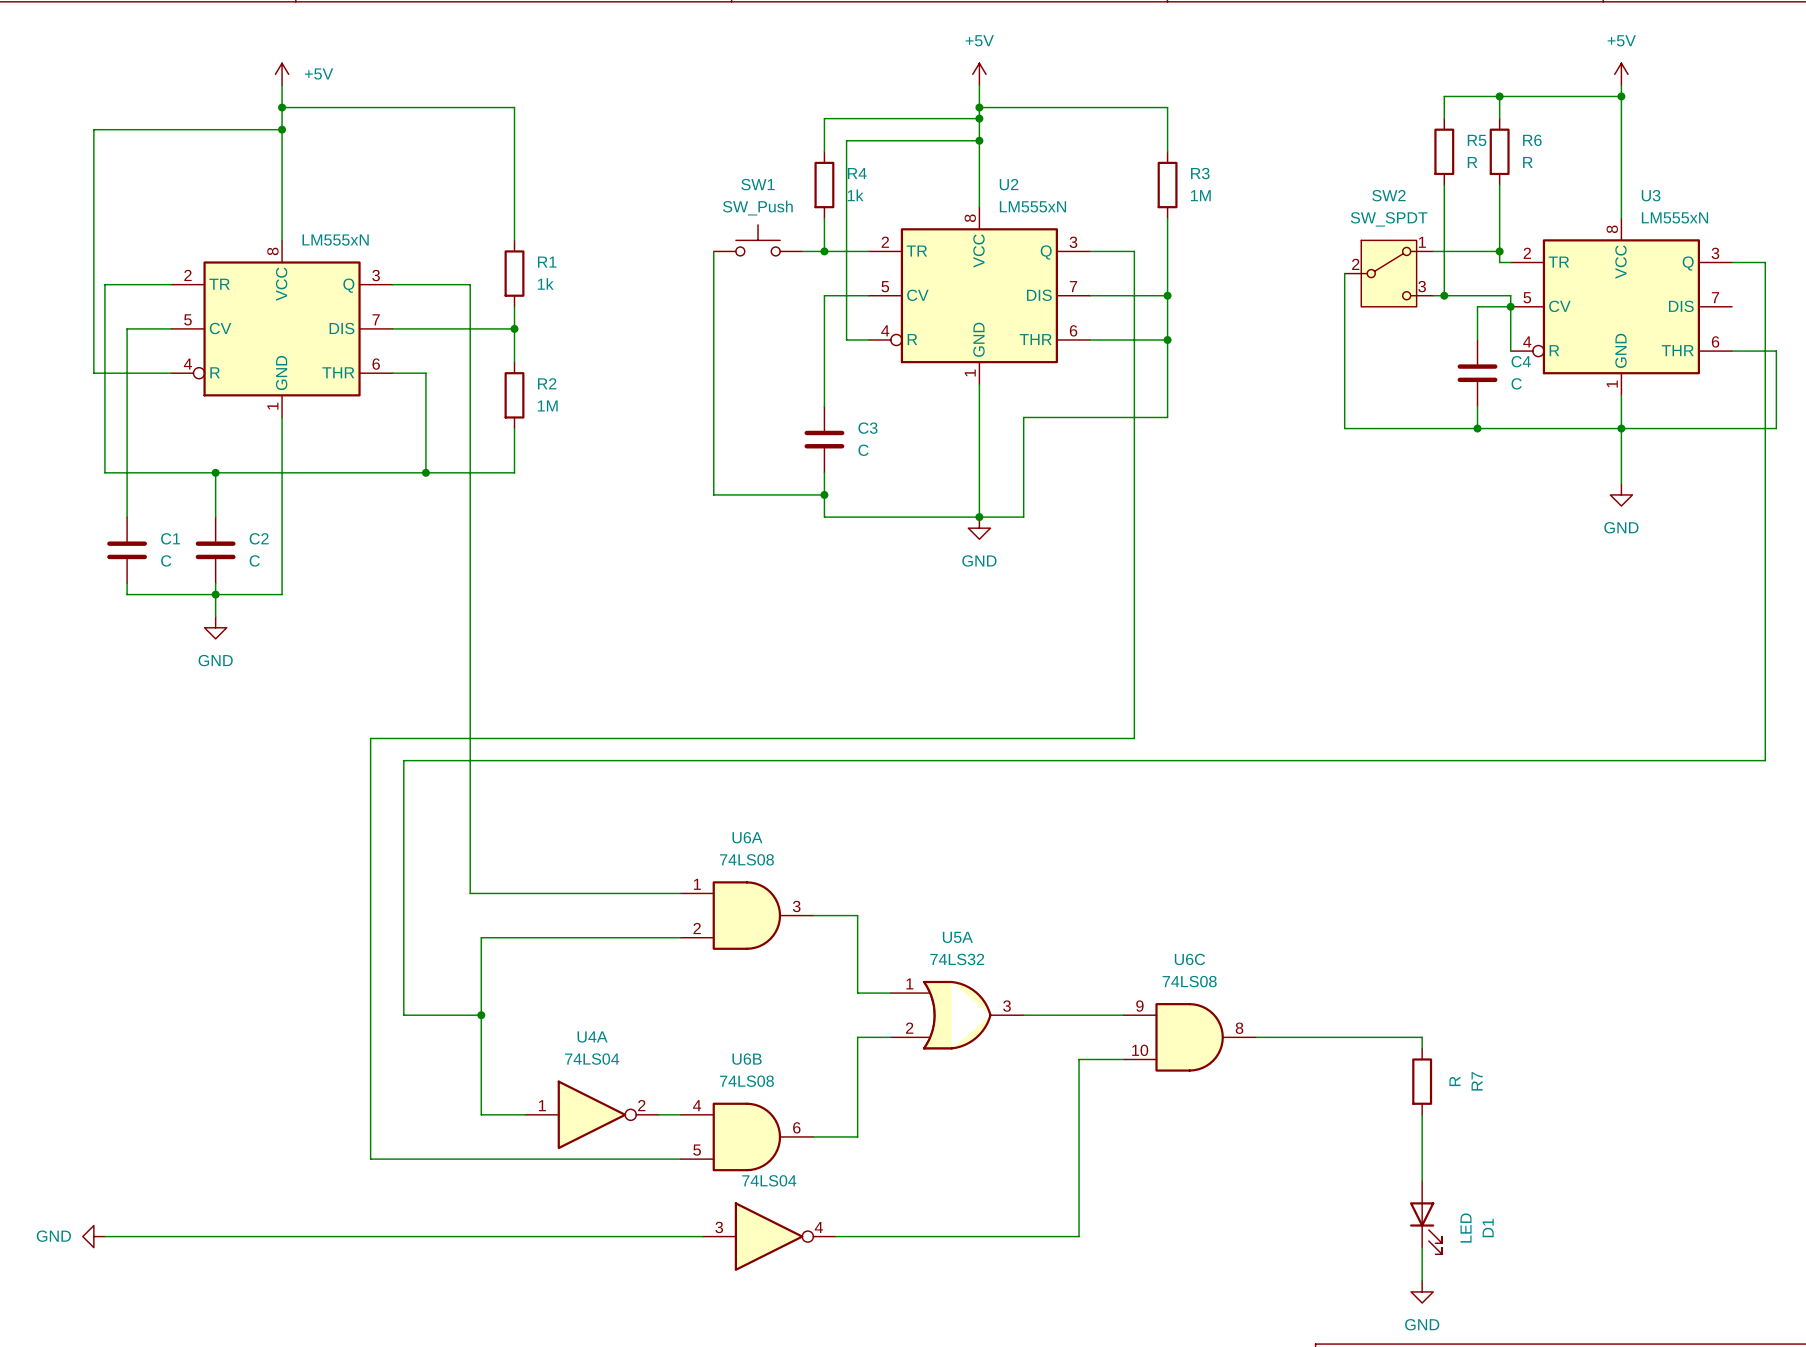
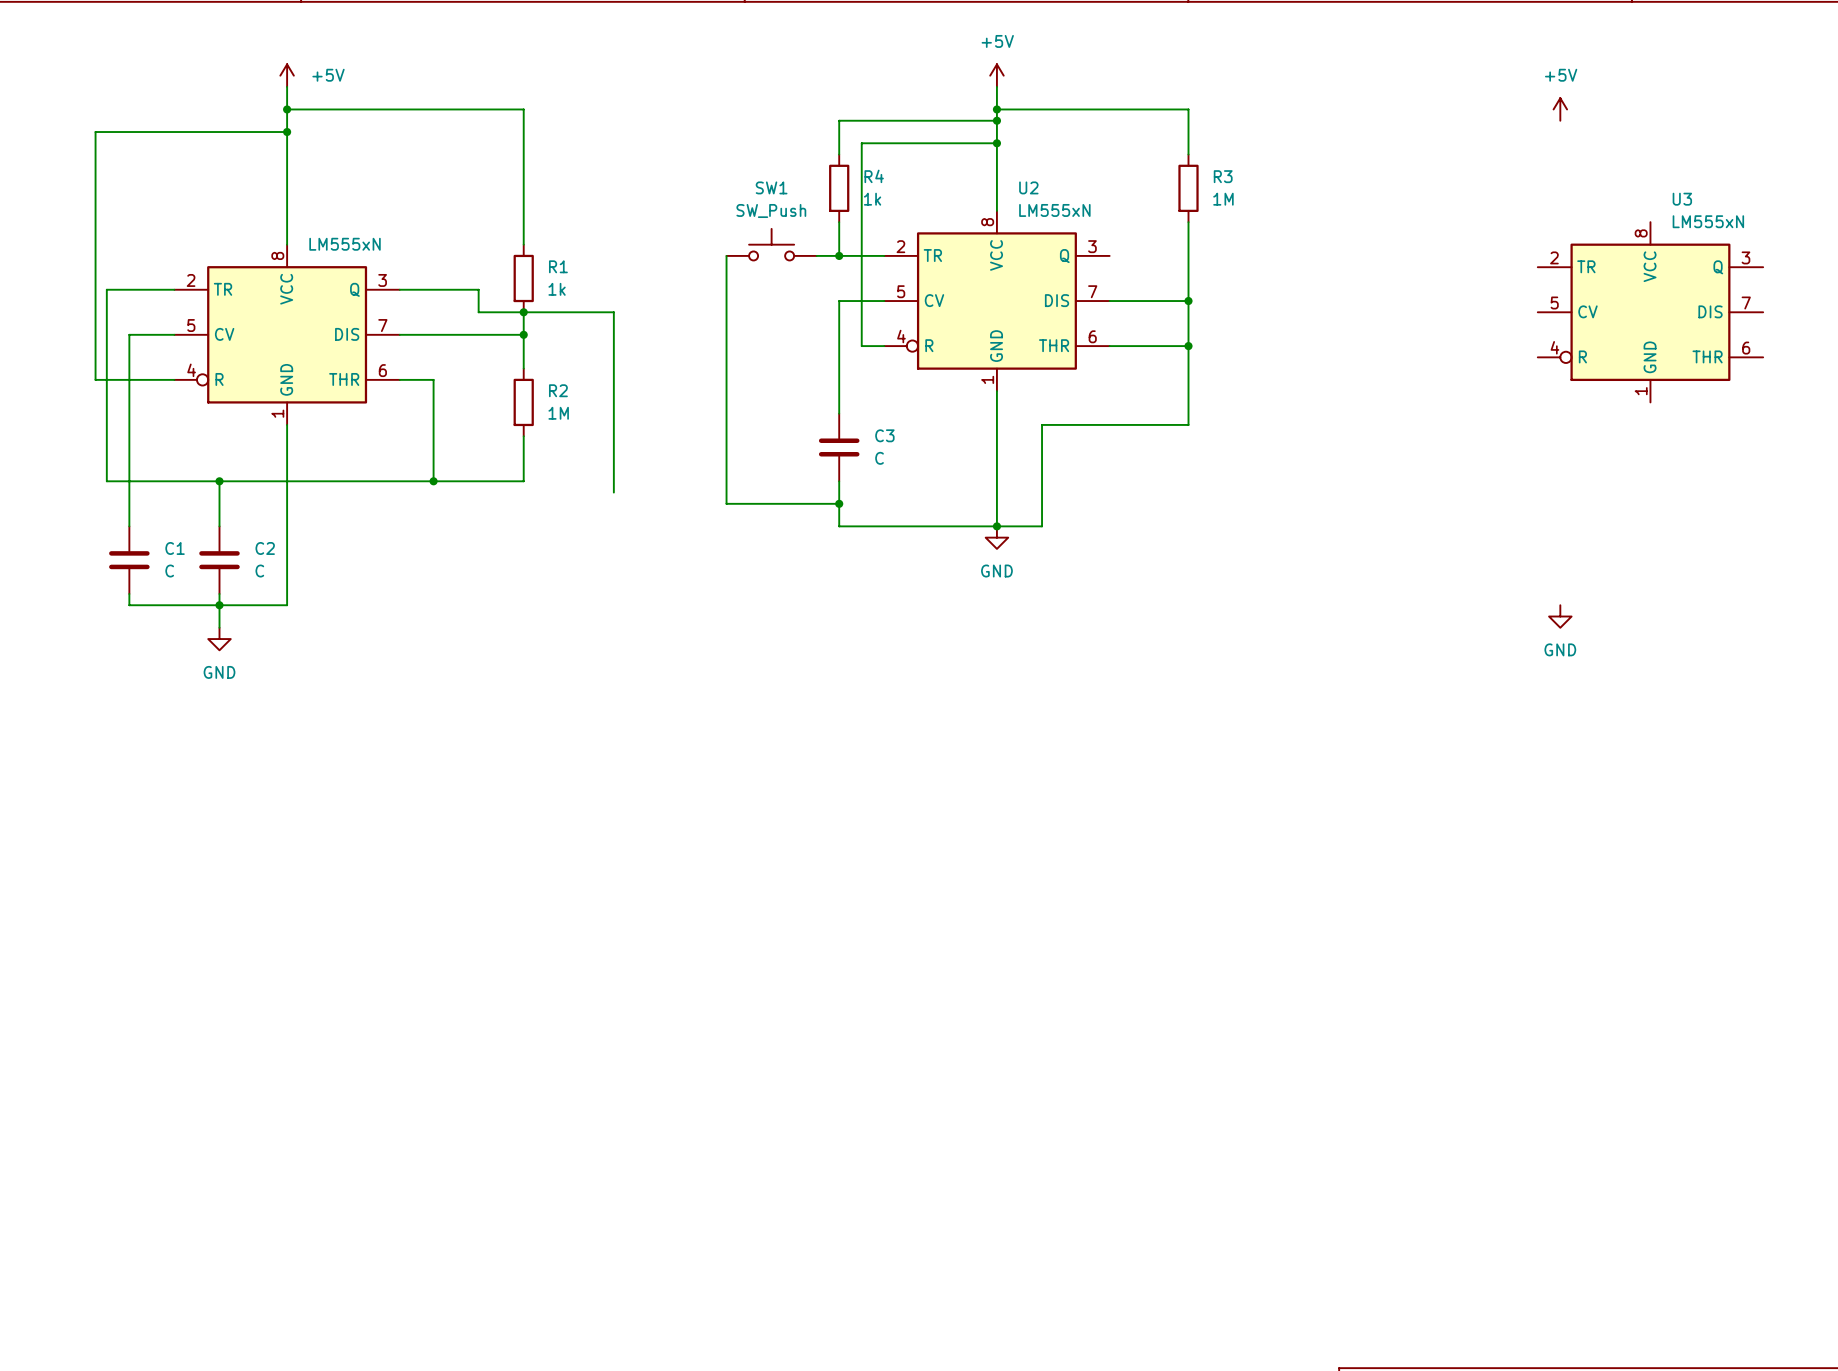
power symbol position: +5V (1621, 74) -> +5V (1560, 109)
wire: (1621, 85) (1621, 218) -> none
wire: (1499, 96) (1499, 118) -> none
junction: (1499, 96) -> none
wire: (1621, 96) (1444, 96) (1444, 118) -> none
junction: (1621, 96) -> none
R5: R (1444, 151) -> none
R6: R (1499, 151) -> none
wire: (1444, 185) (1444, 295) -> none
wire: (1499, 185) (1499, 262) (1510, 262) -> none
wire: (1090, 251) (1134, 251) (1134, 738) (370, 738) (370, 1159) (680, 1159) -> none
wire: (1433, 251) (1499, 251) -> none
junction: (1499, 251) -> none
wire: (1732, 262) (1765, 262) (1765, 760) (403, 760) (403, 1015) (481, 1015) -> none
wire: (1344, 273) (1344, 428) (1776, 428) (1776, 351) (1732, 351) -> none
SW2: SW_SPDT (1388, 273) -> none
wire: (1433, 295) (1510, 295) (1510, 351) -> none
junction: (1444, 295) -> none
wire: (470, 306) (470, 893) (680, 893) -> (478, 312) (613, 312) (613, 492)
junction: none -> (523, 312)
wire: (1510, 306) (1477, 306) (1477, 339) -> none
junction: (1510, 306) -> none
C4: C (1477, 373) -> none
wire: (1621, 395) (1621, 483) -> none
wire: (1477, 406) (1477, 428) -> none
junction: (1477, 428) -> none
junction: (1621, 428) -> none
power symbol position: GND (1621, 494) -> GND (1560, 616)
U6A: 74LS08 (746, 915) -> none
wire: (813, 915) (857, 915) (857, 993) (890, 993) -> none
wire: (680, 937) (481, 937) (481, 1114) (525, 1114) -> none
junction: (481, 1015) -> none
U5A: 74LS32 (957, 1015) -> none
wire: (1023, 1015) (1123, 1015) -> none
wire: (890, 1037) (857, 1037) (857, 1136) (813, 1136) -> none
U6C: 74LS08 (1189, 1037) -> none
wire: (1256, 1037) (1422, 1037) (1422, 1048) -> none
wire: (1123, 1059) (1079, 1059) (1079, 1236) (835, 1236) -> none
R7: R (1422, 1081) -> none
U4A: 74LS04 (591, 1114) -> none
wire: (658, 1114) (680, 1114) -> none
wire: (1422, 1114) (1422, 1181) -> none
U6B: 74LS08 (746, 1136) -> none
D1: LED (1426, 1217) -> none
power symbol: GND (93, 1236) -> none
wire: (104, 1236) (702, 1236) -> none
part: 74LS04 (769, 1236) -> none
wire: (1422, 1247) (1422, 1280) -> none
power symbol: GND (1422, 1291) -> none

